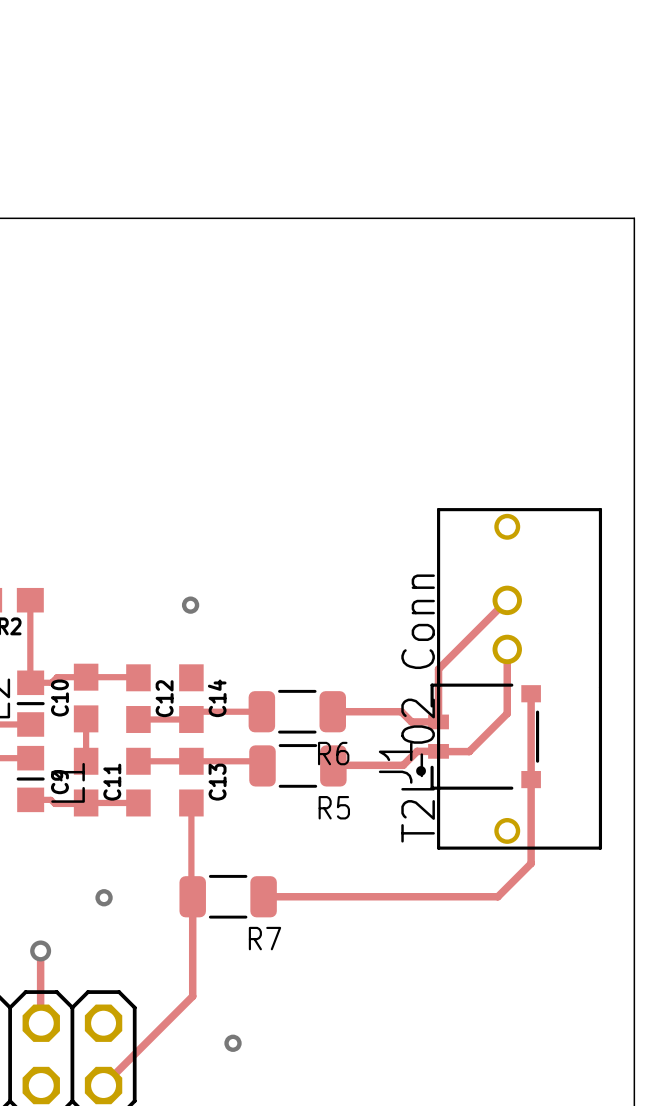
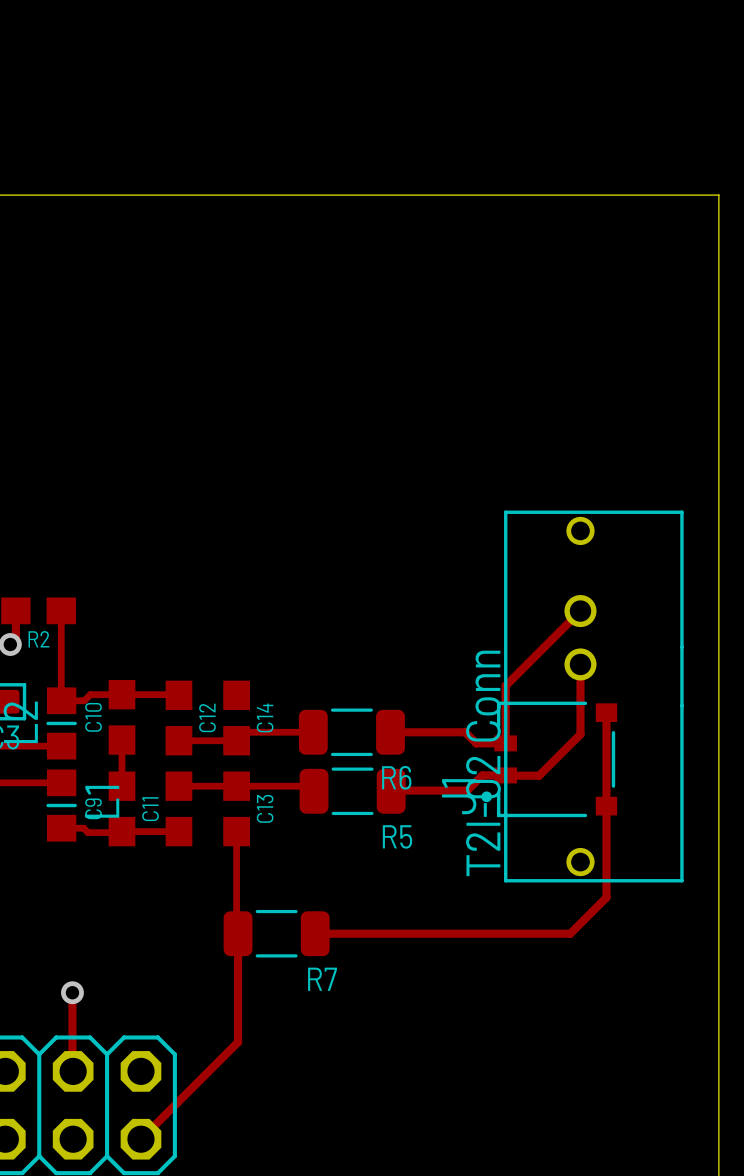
via: (190, 605) -> none
via: (104, 897) -> none
via: (233, 1043) -> none

